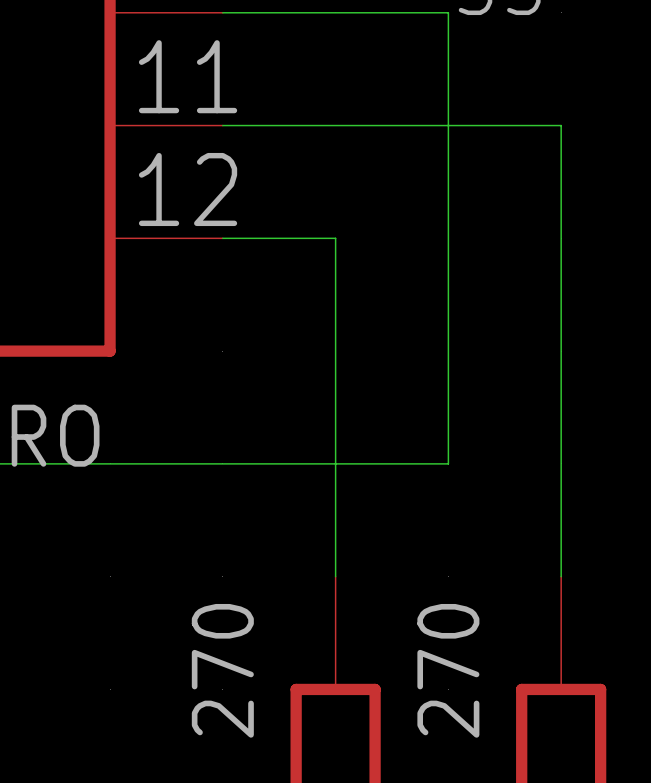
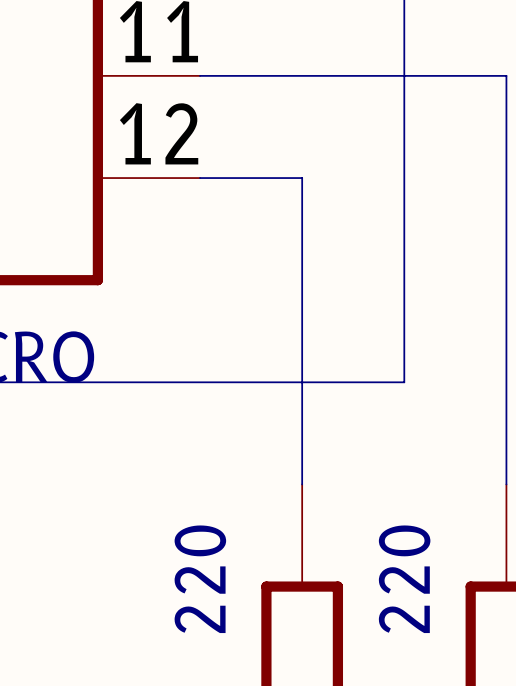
part value: 270 (222, 670) -> 220 (200, 579)
part value: 270 (448, 670) -> 220 (404, 579)

